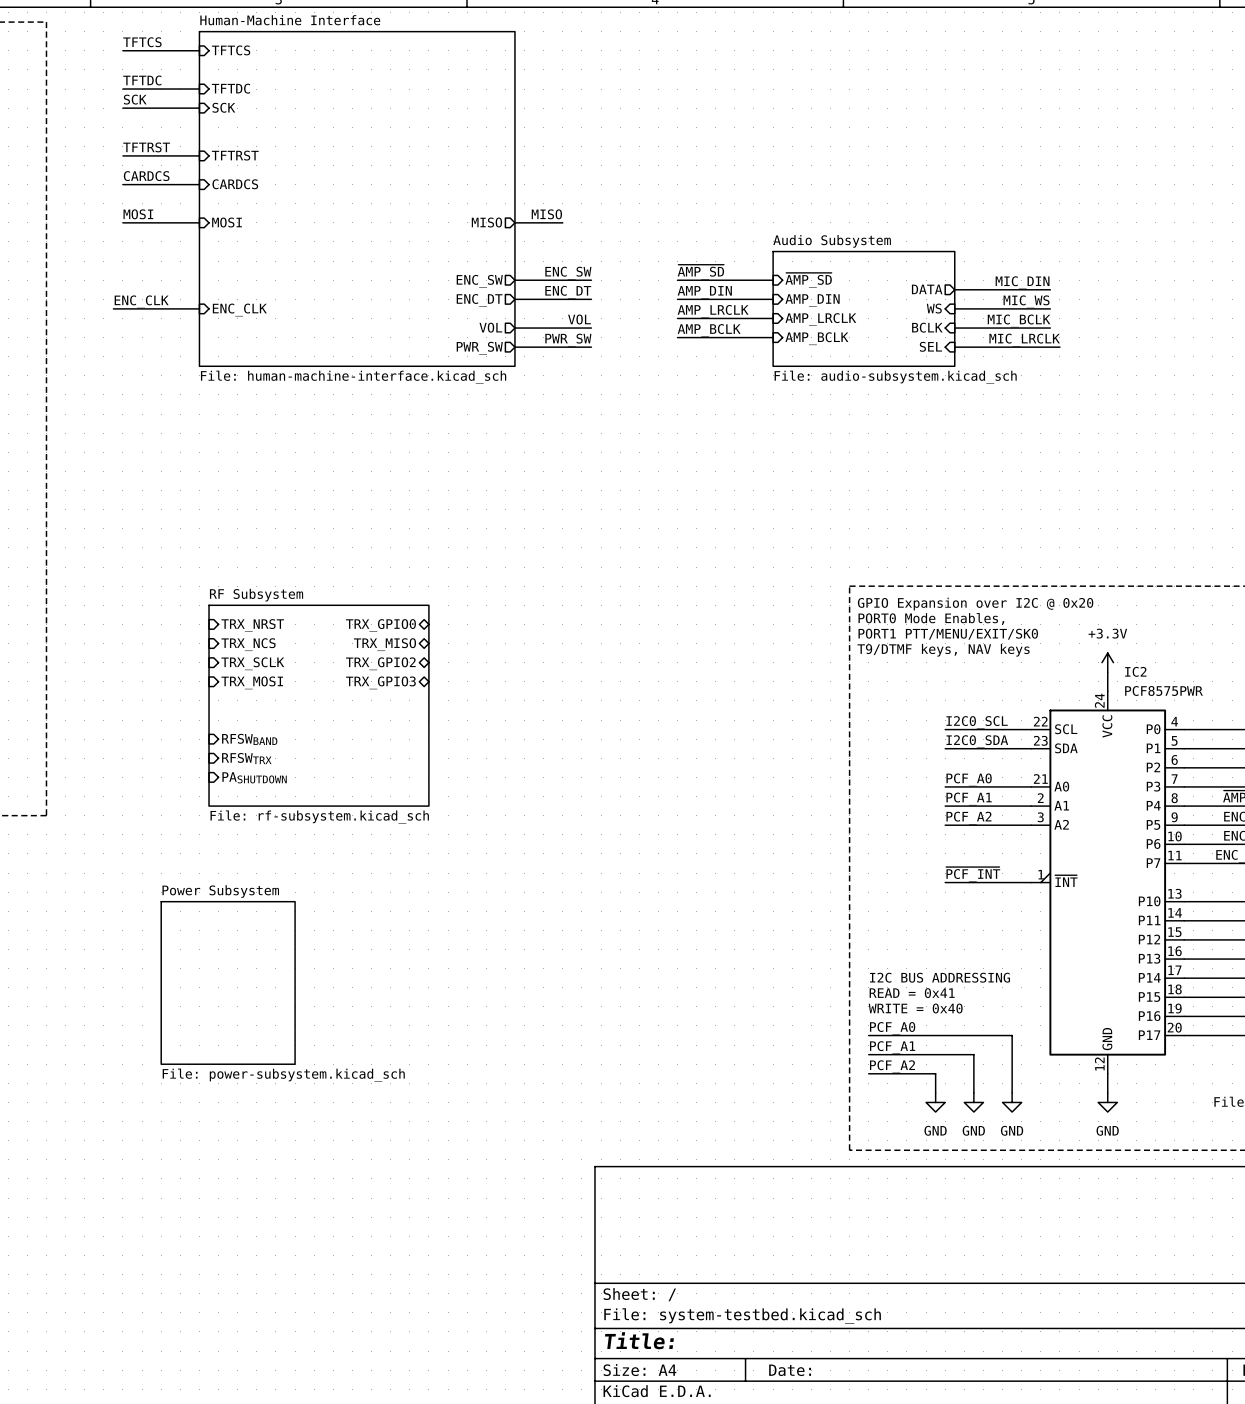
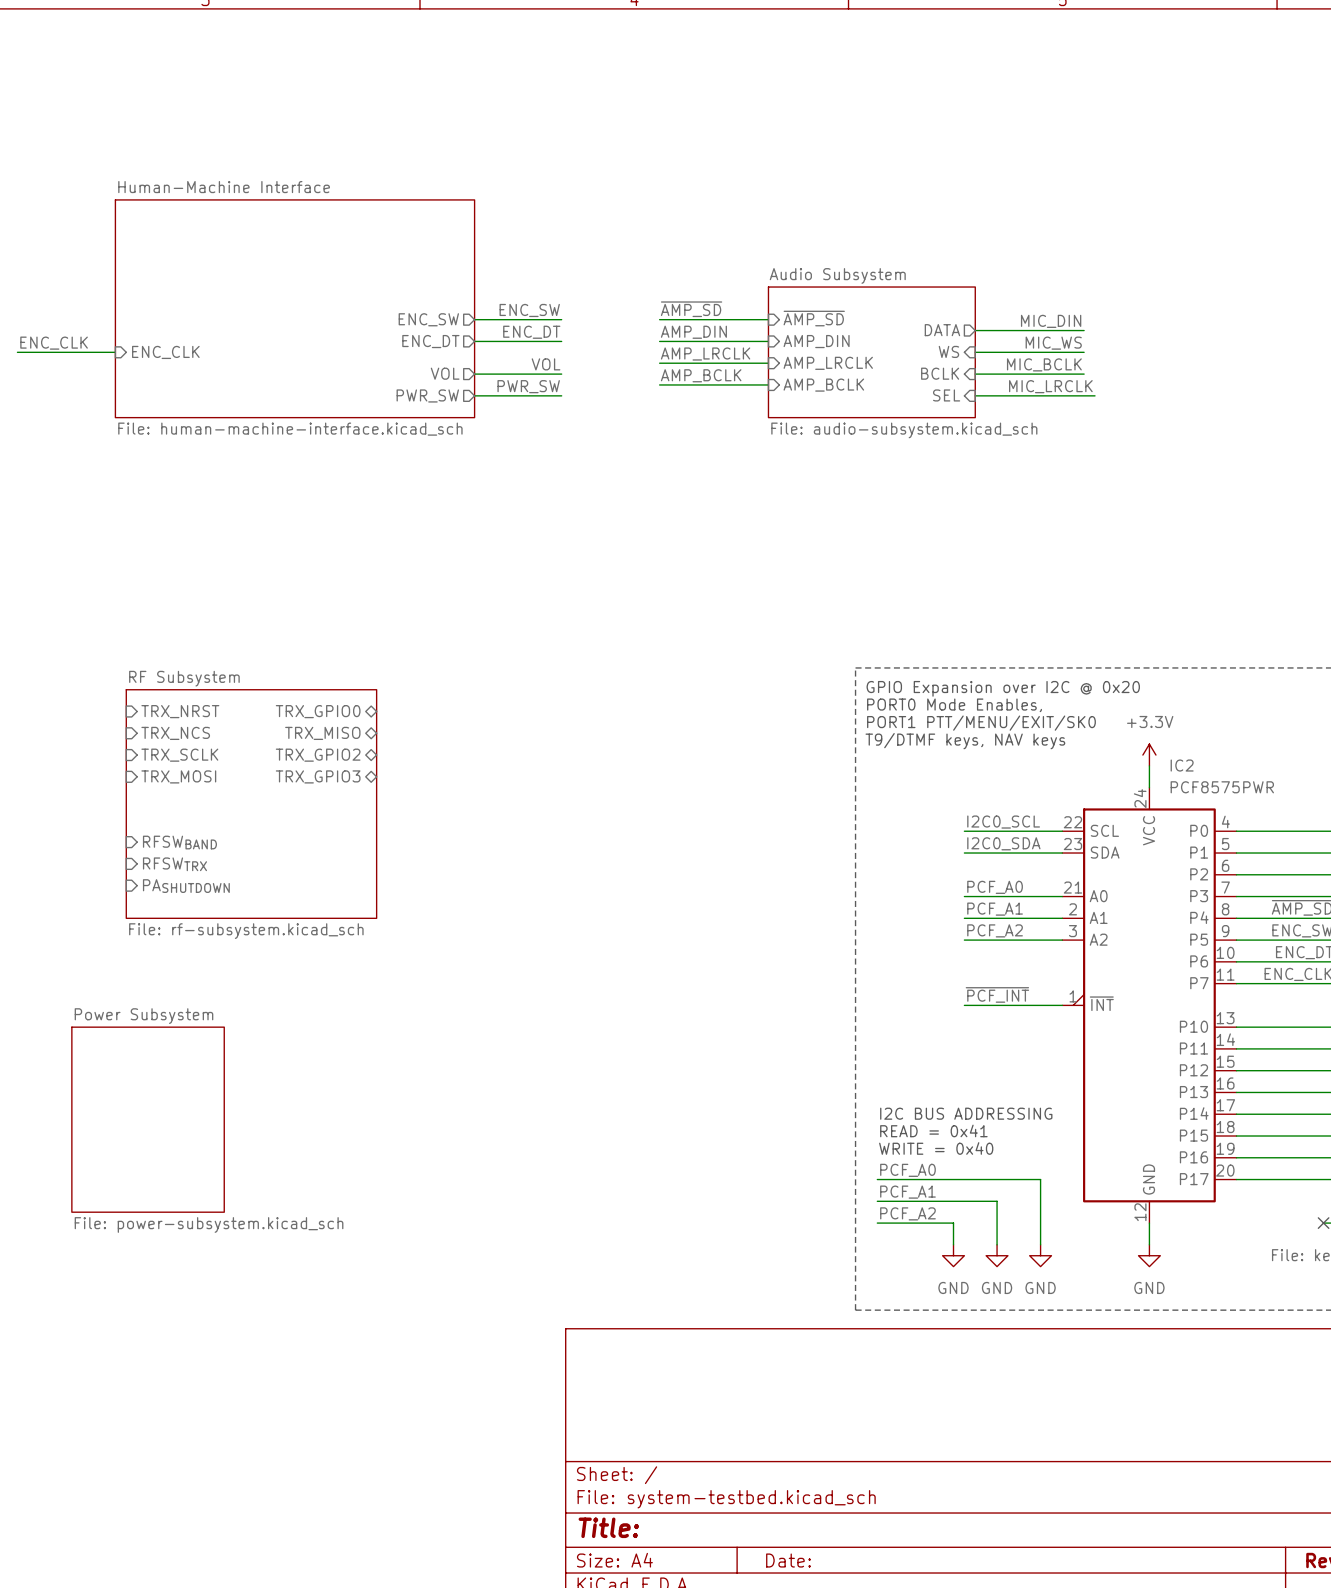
label: TFTCS (142, 42) -> none
wire: (122, 50) (199, 50) -> none
sheet pin: TFTCS (231, 50) -> none
label: TFTDC (142, 80) -> none
sheet pin: TFTDC (230, 88) -> none
wire: (122, 89) (199, 89) -> none
label: SCK (135, 99) -> none
sheet pin: SCK (223, 107) -> none
wire: (122, 108) (199, 108) -> none
label: TFTRST (146, 147) -> none
wire: (122, 155) (199, 155) -> none
sheet pin: TFTRST (235, 155) -> none
label: CARDCS (146, 176) -> none
wire: (122, 184) (199, 184) -> none
sheet pin: CARDCS (235, 184) -> none
sheet Human-Machine Interface: File: human-machine-interface.kicad_sch (357, 198) -> none
label: MOSI (138, 214) -> none
label: MISO (546, 214) -> none
wire: (122, 222) (199, 222) -> none
sheet pin: MOSI (227, 222) -> none
sheet pin: MISO (486, 222) -> none
wire: (514, 222) (562, 222) -> none
sheet Human-Machine Interface: none -> File: human-machine-interface.kicad_sch (295, 308)

